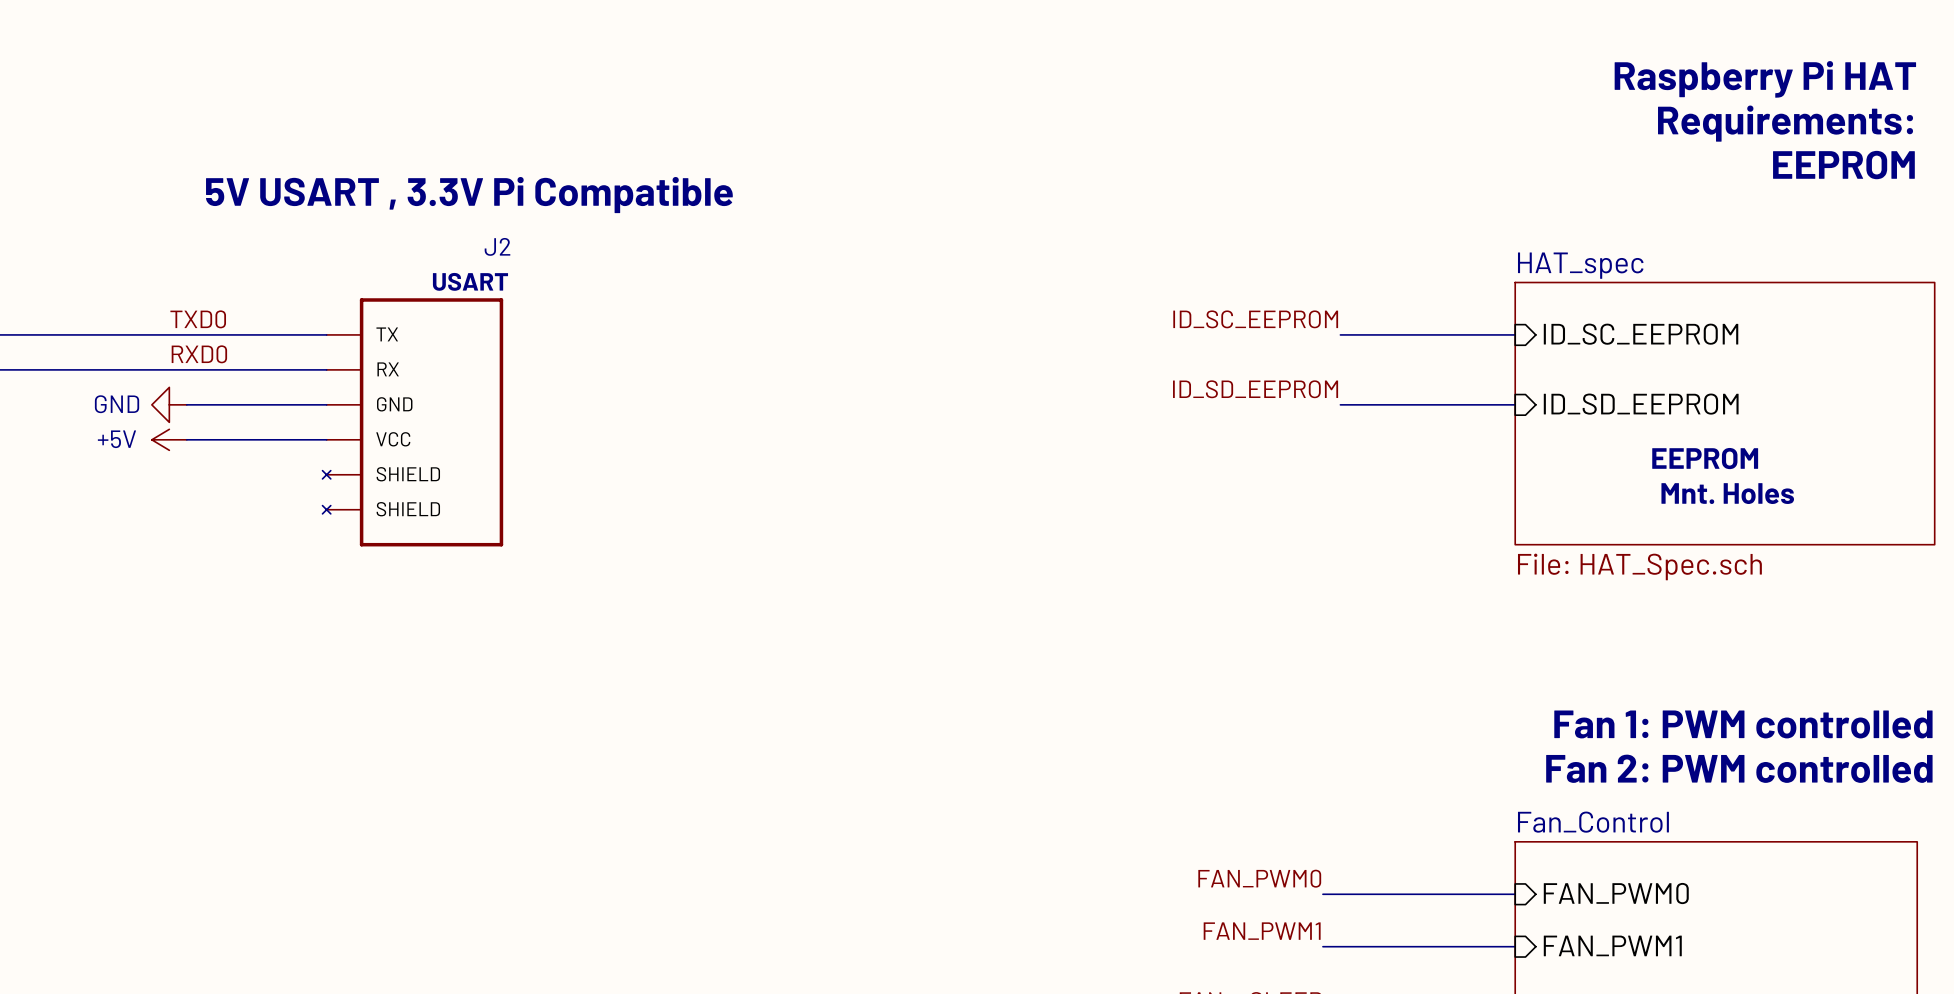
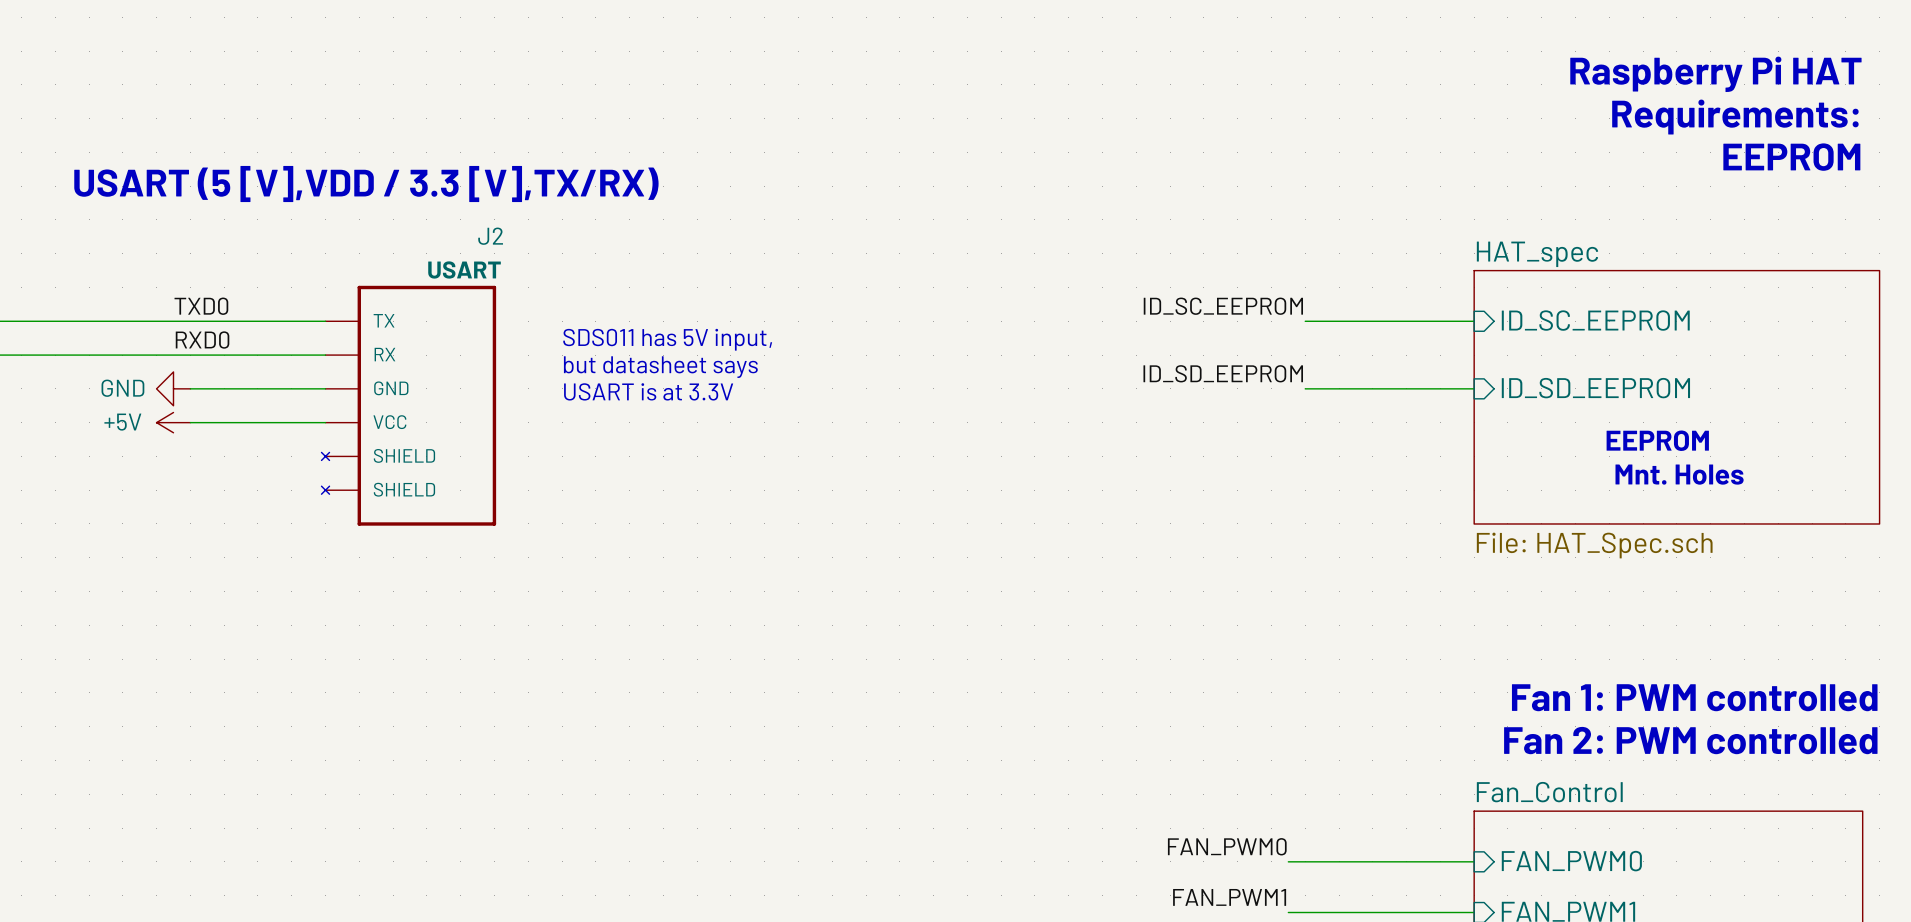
text: none -> USART (5 [V],VDD / 3.3 [V],TX/RX) (366, 184)
text: 5V USART , 3.3V Pi Compatible (469, 195) -> none
text: none -> SDS011 has 5V input, (667, 339)
text: none -> but datasheet says (660, 367)
text: none -> USART is at 3.3V (648, 391)

